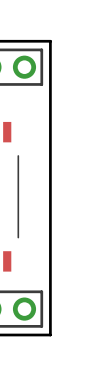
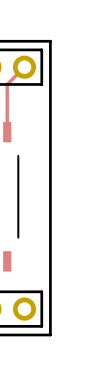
track: none -> (24, 67) (7, 84) (7, 132)

